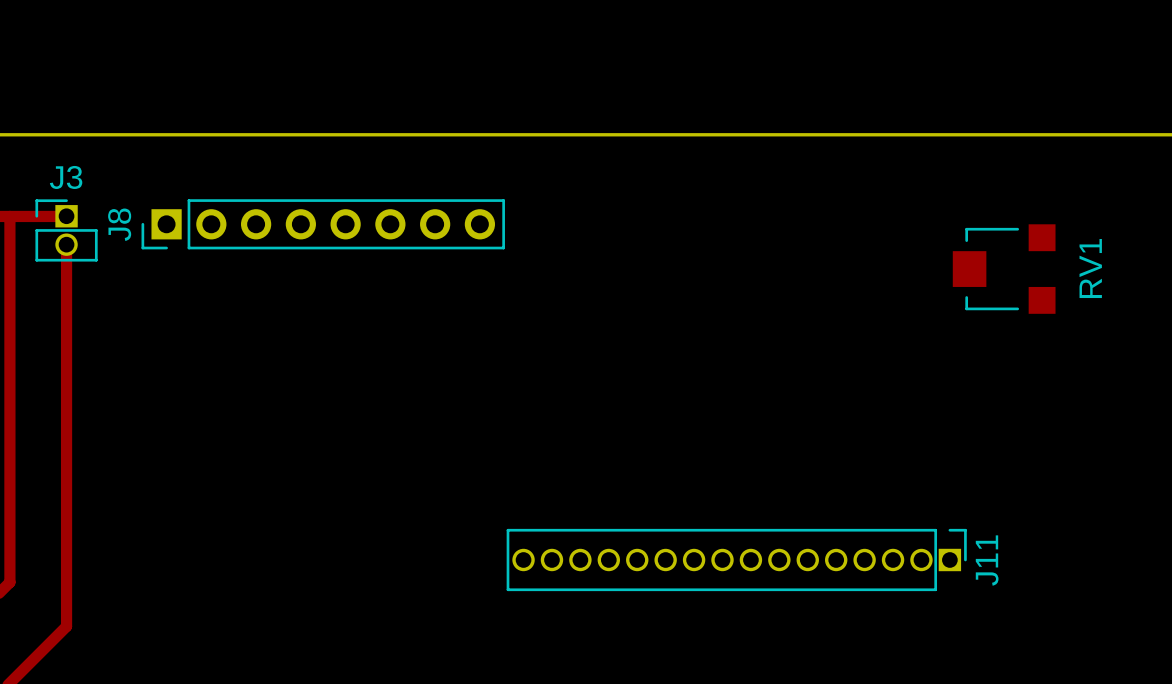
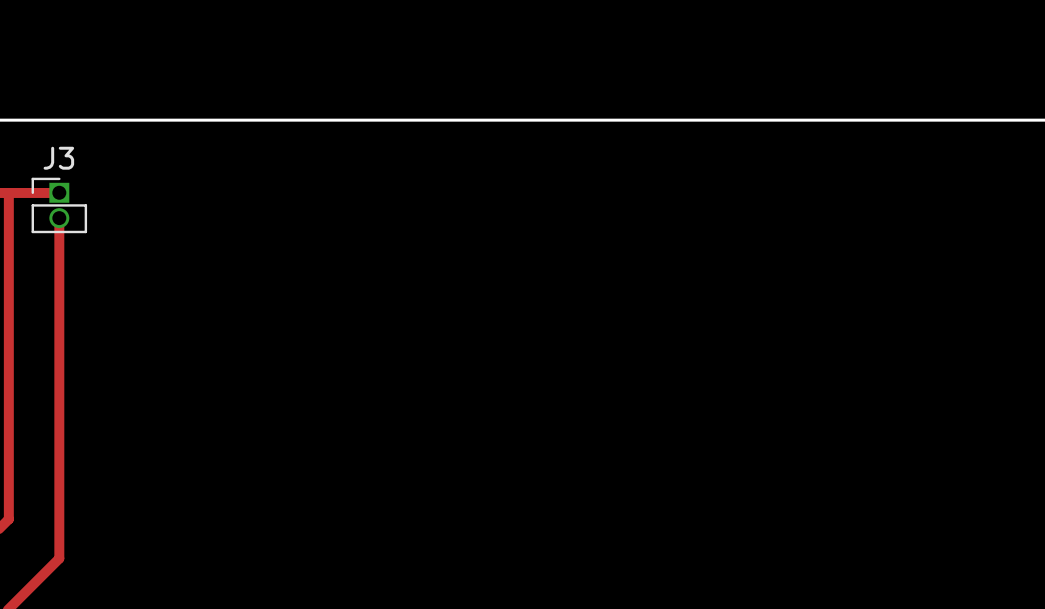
J8: (323, 224) -> none
RV1: (1004, 269) -> none
J11: (736, 559) -> none

